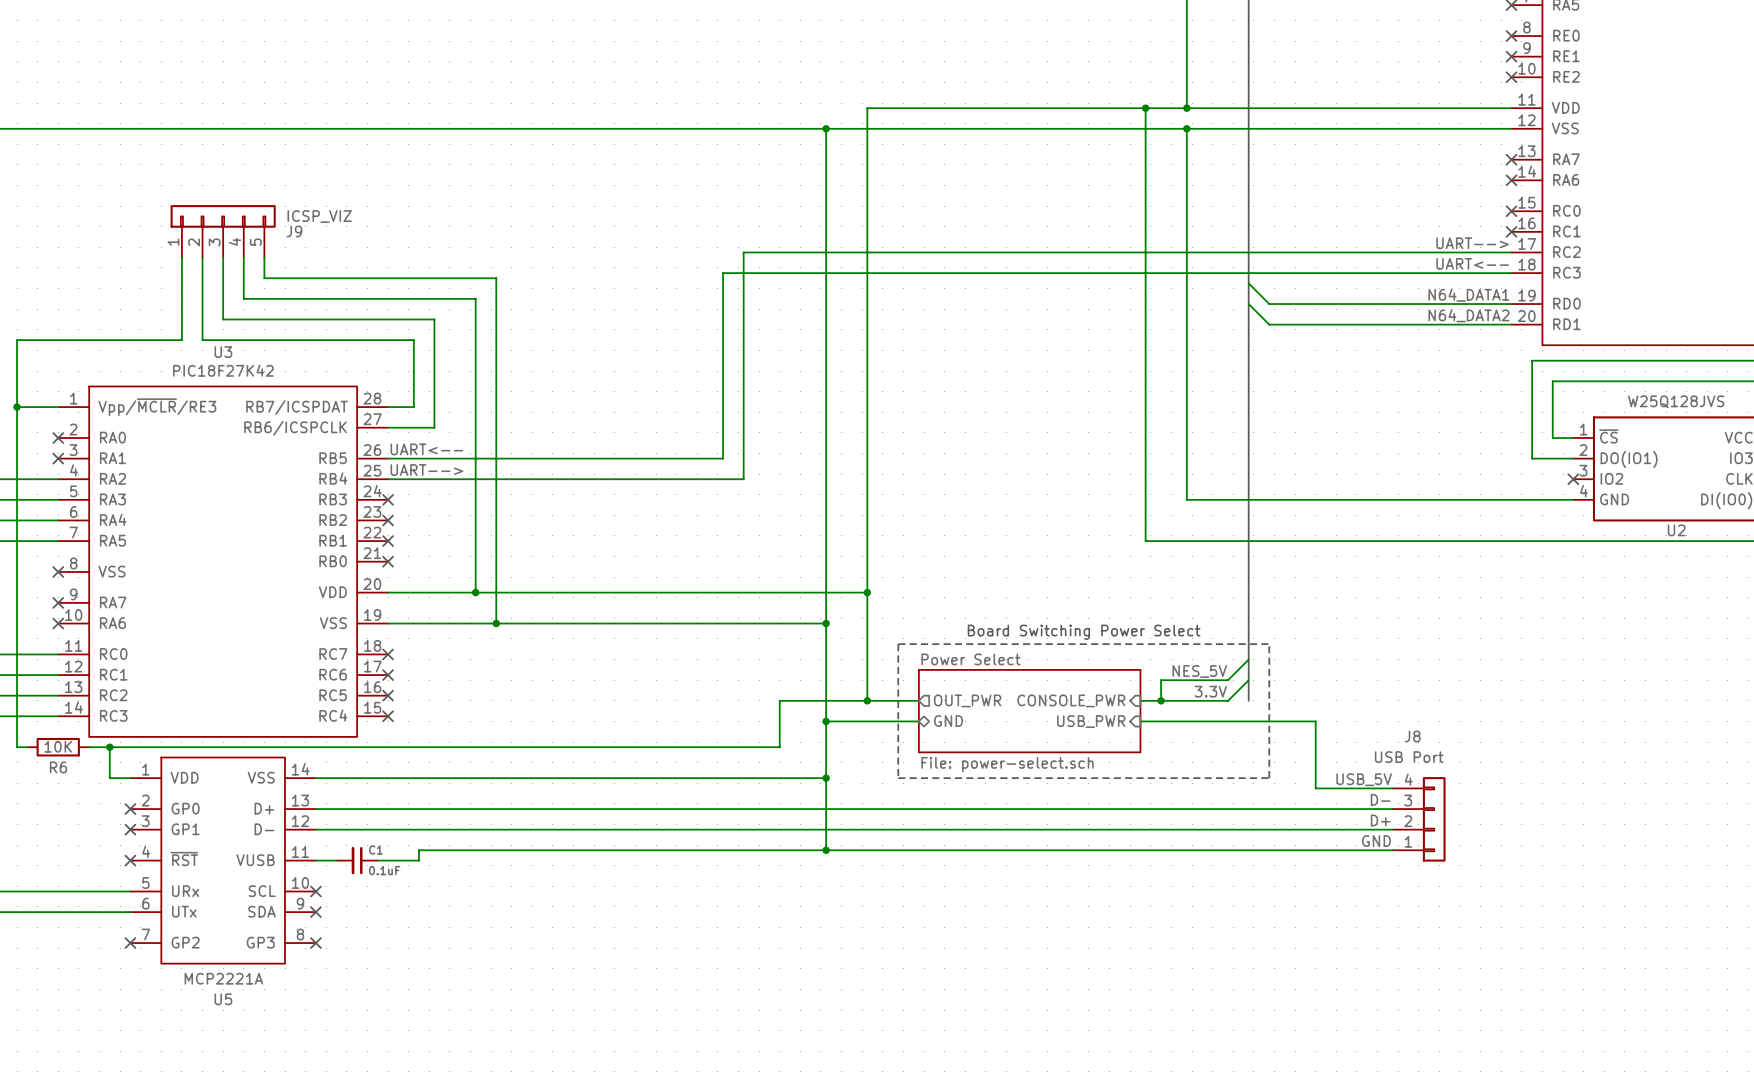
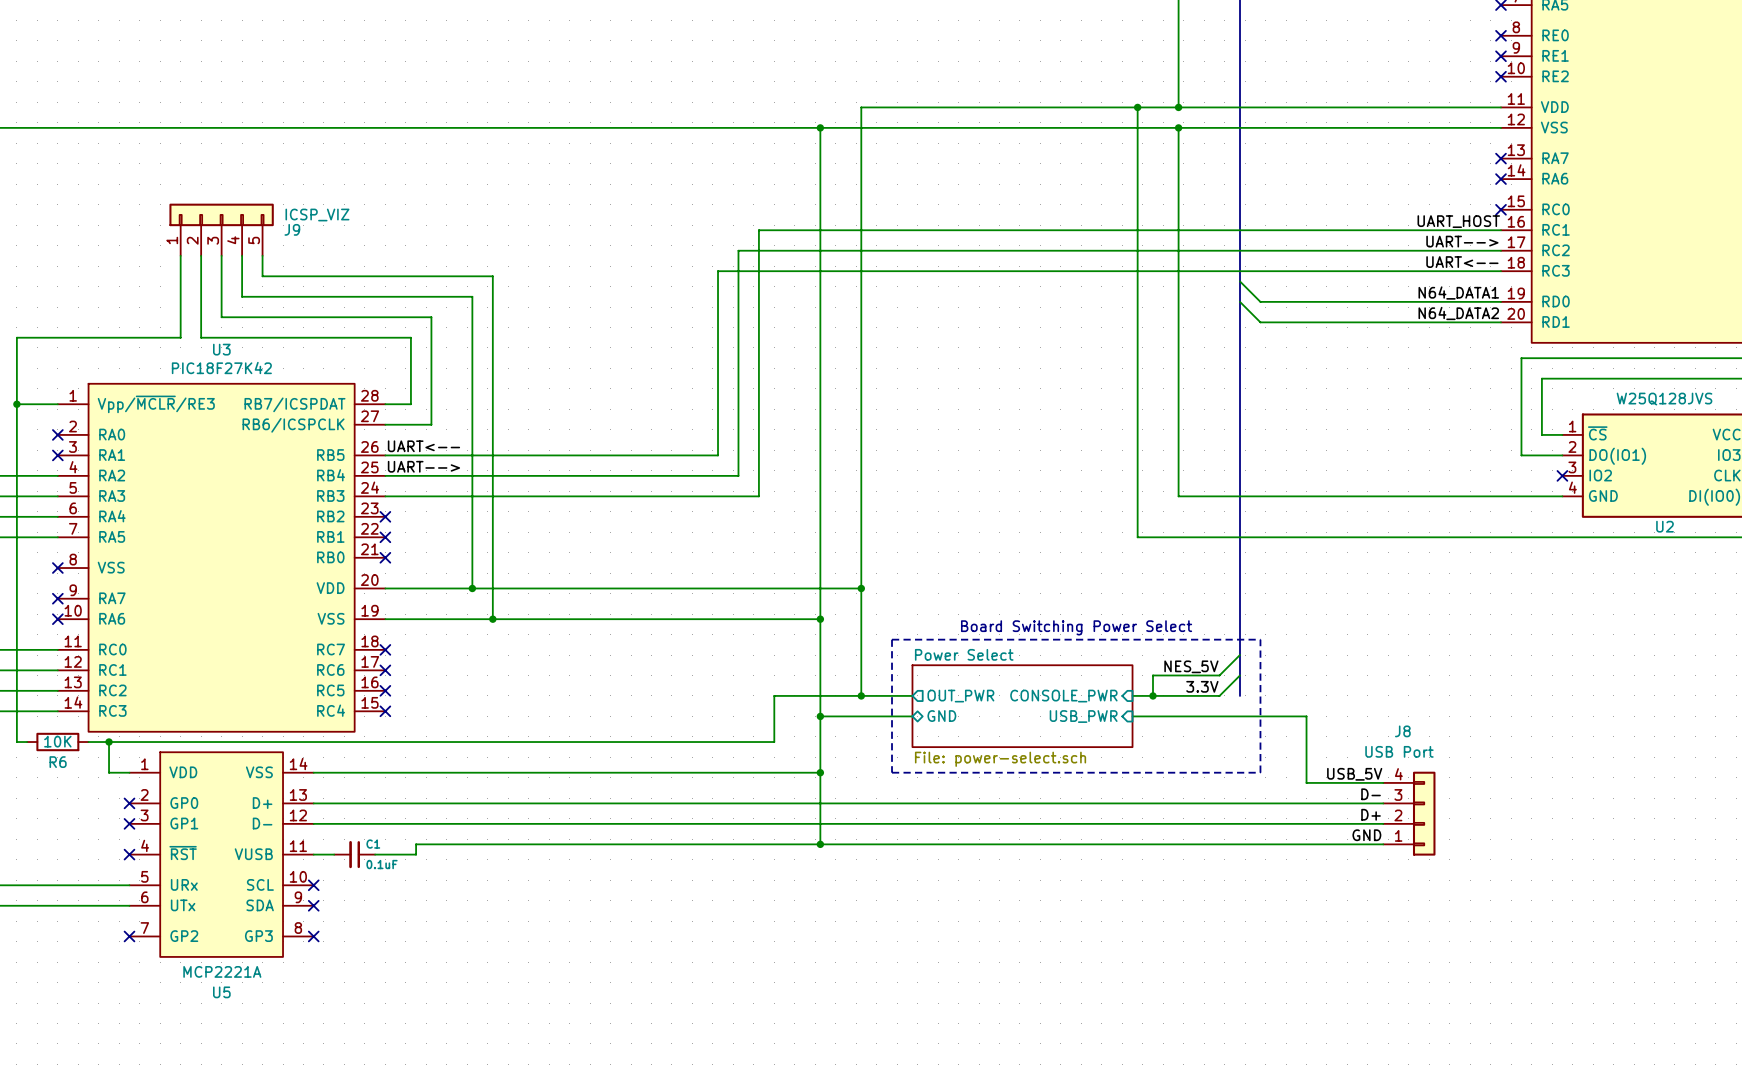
label: none -> UART_HOST (1458, 221)
wire: none -> (1500, 230) (758, 230) (758, 496) (385, 496)
no-connect mark: (1511, 231) -> none
no-connect mark: (388, 499) -> none

